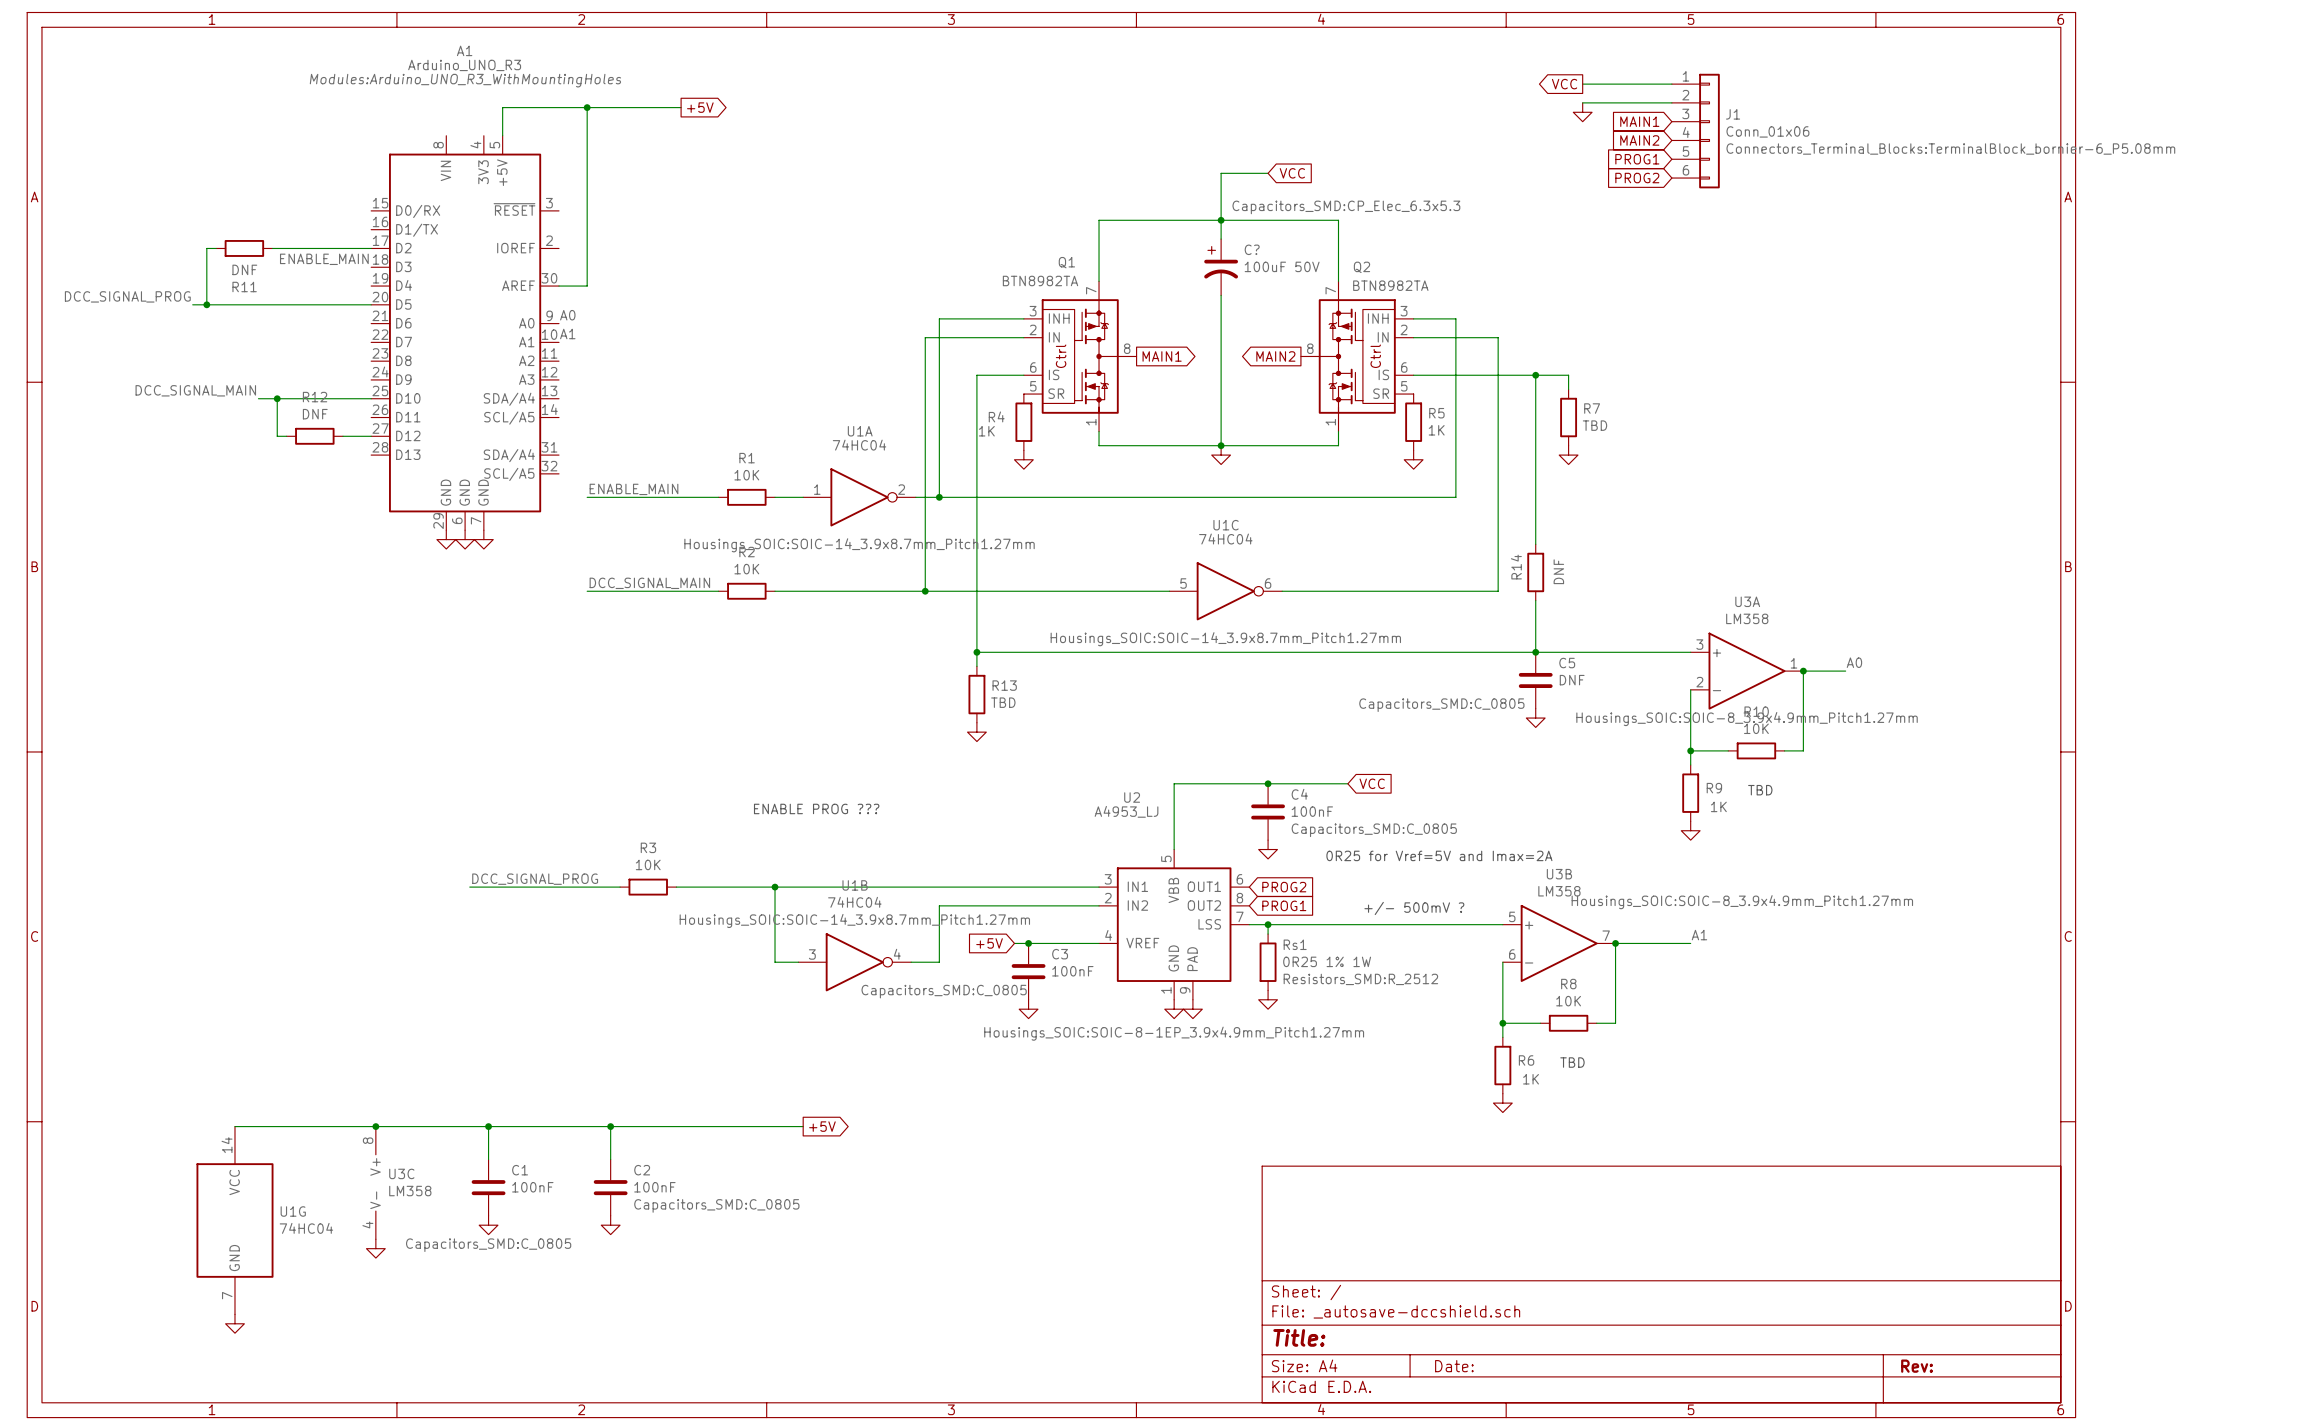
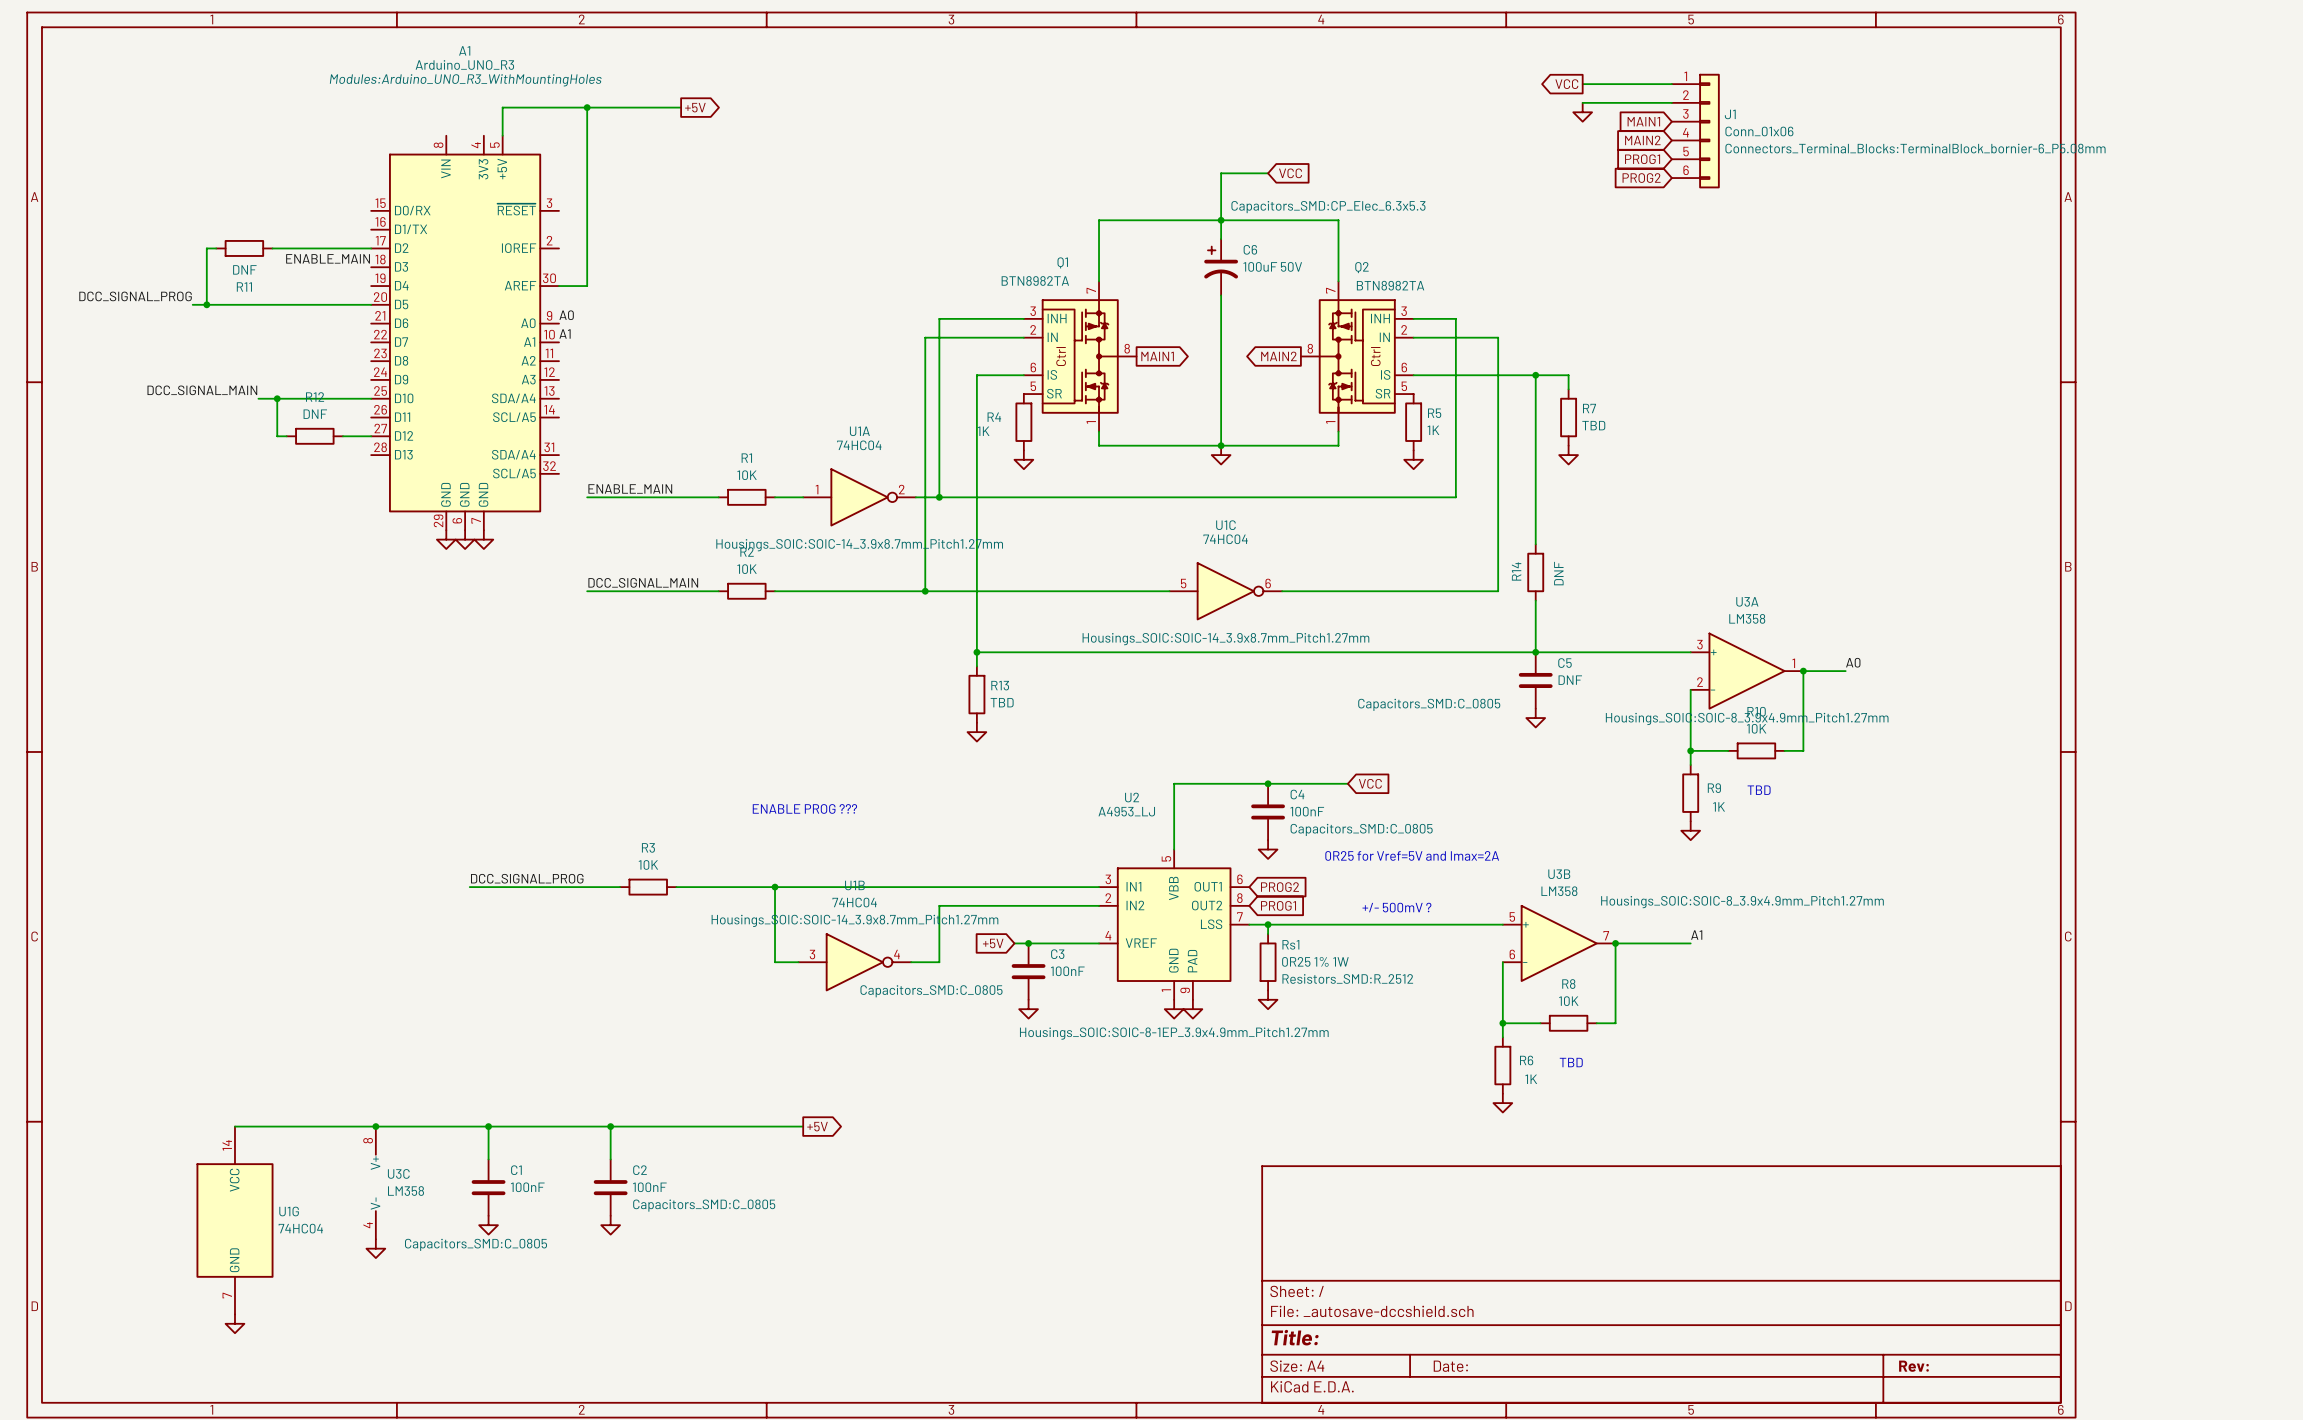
C? name: C? (1252, 249) -> C6 (1250, 249)

